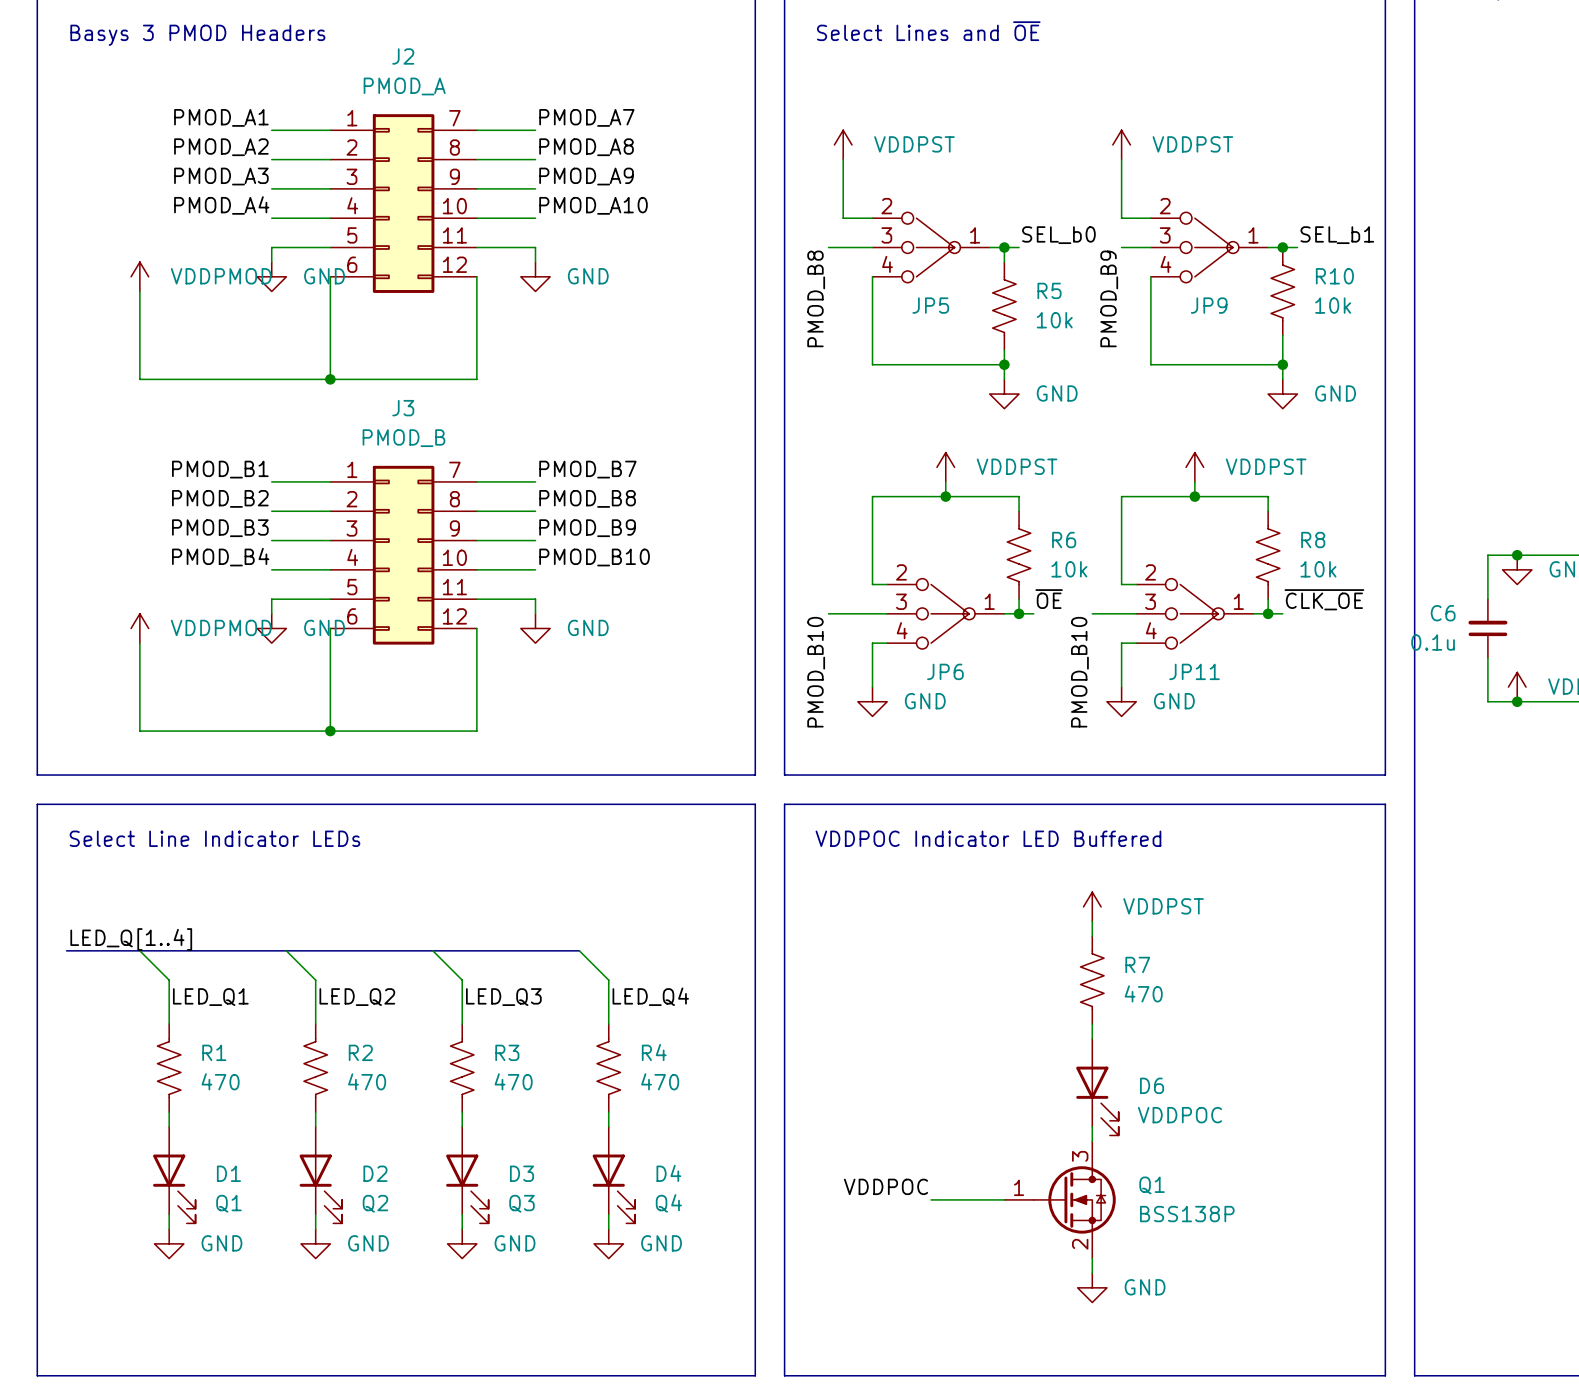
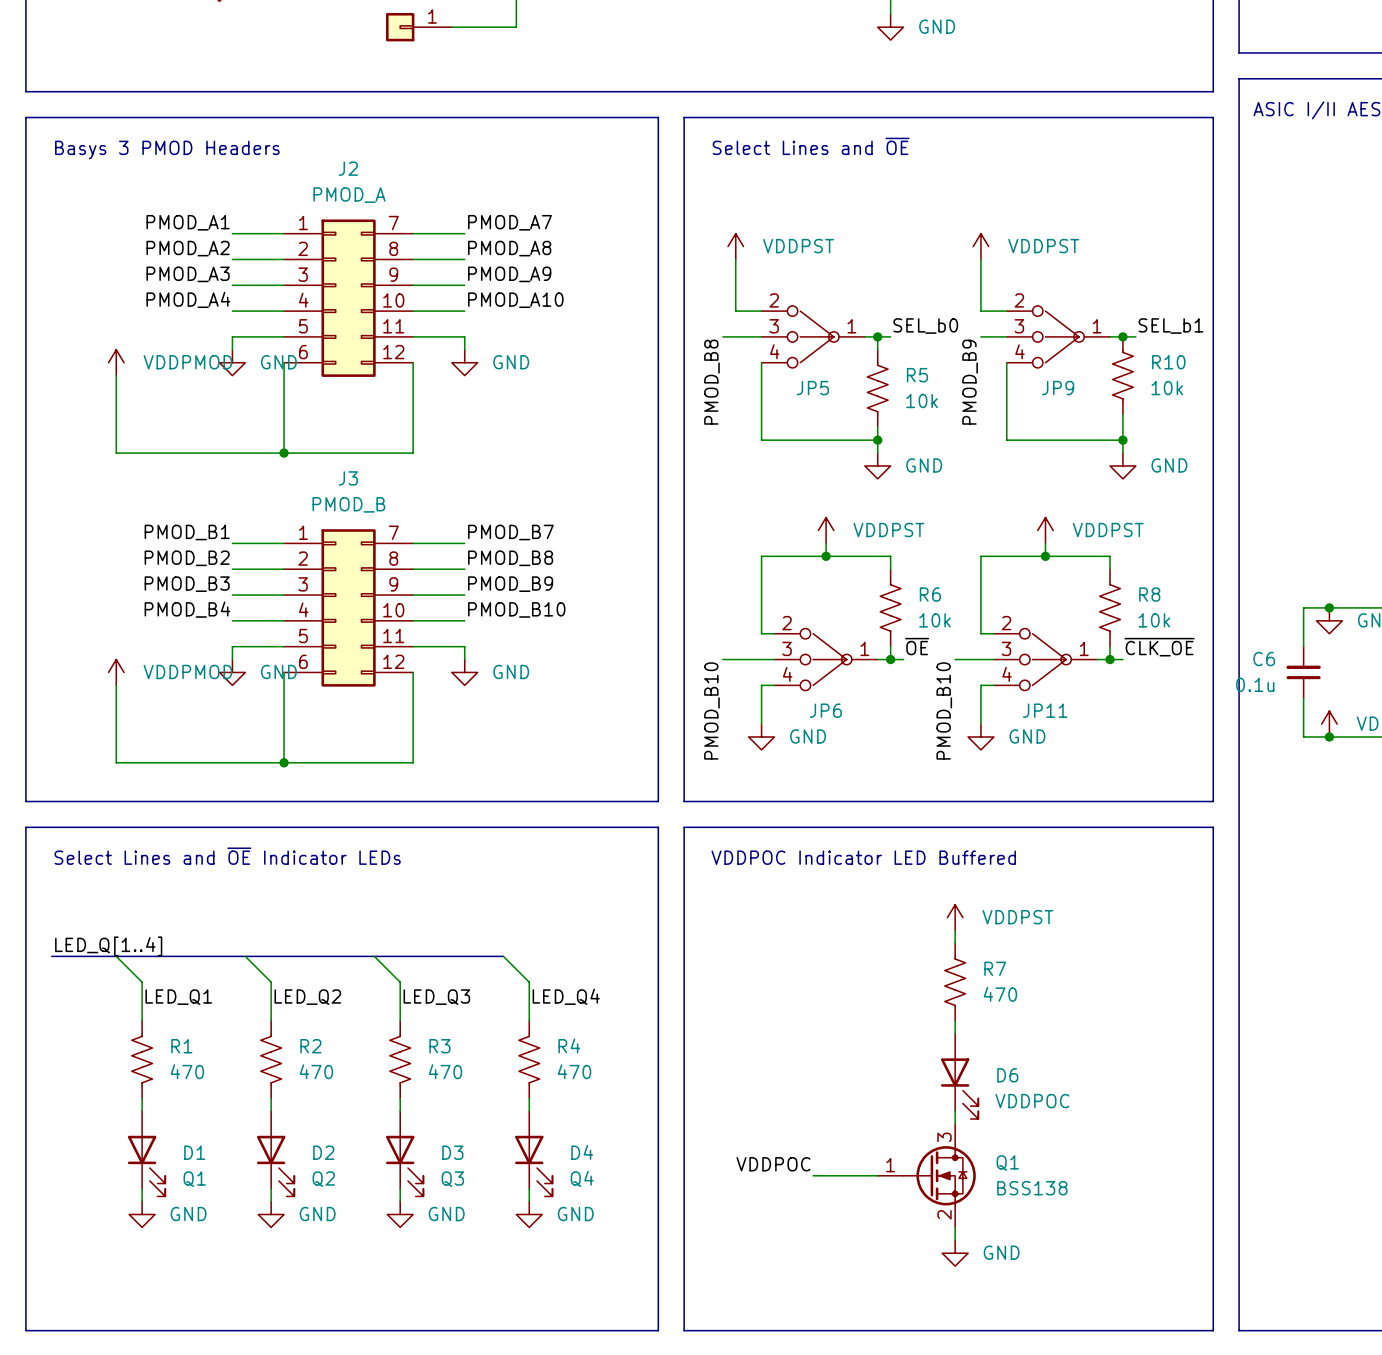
text: Select Line Indicator LEDs (214, 838) -> Select Lines and ~{OE} Indicator LEDs (227, 856)
Q1 value: BSS138P (1187, 1214) -> BSS138 (1032, 1188)

